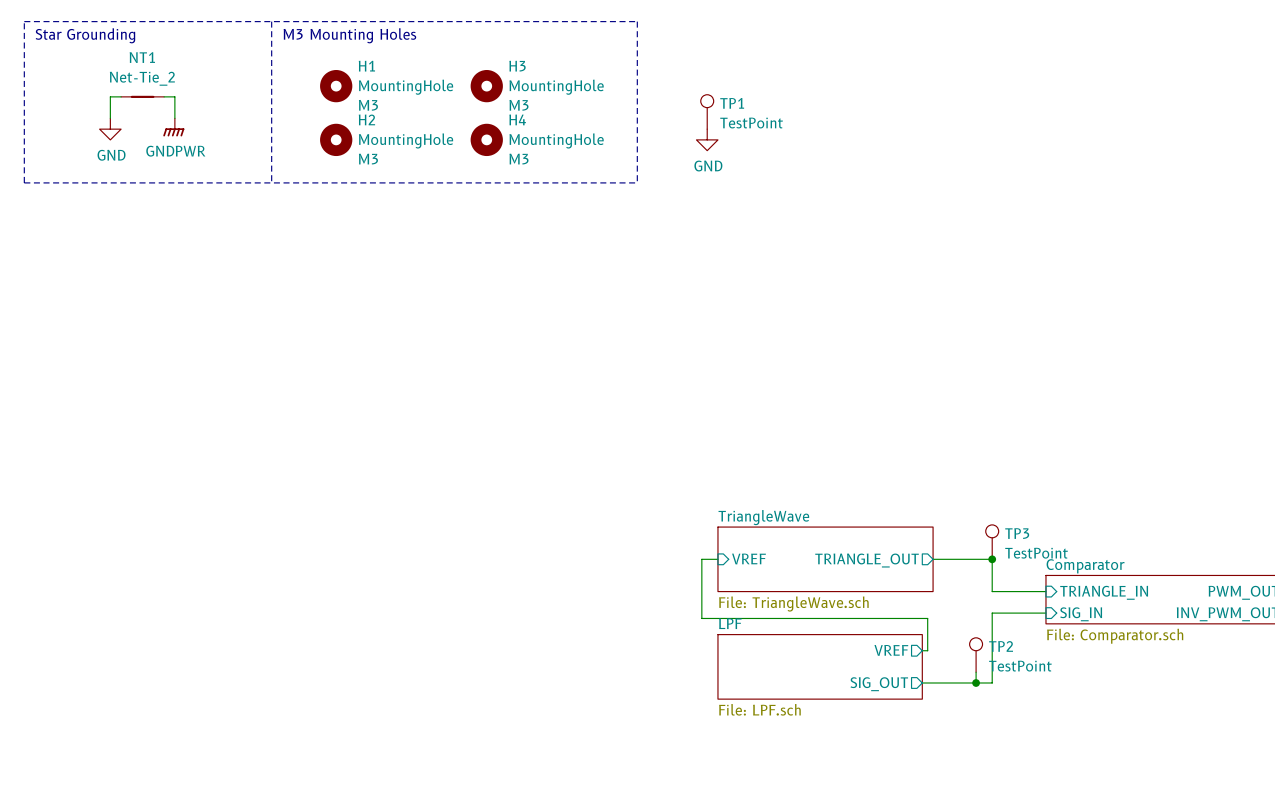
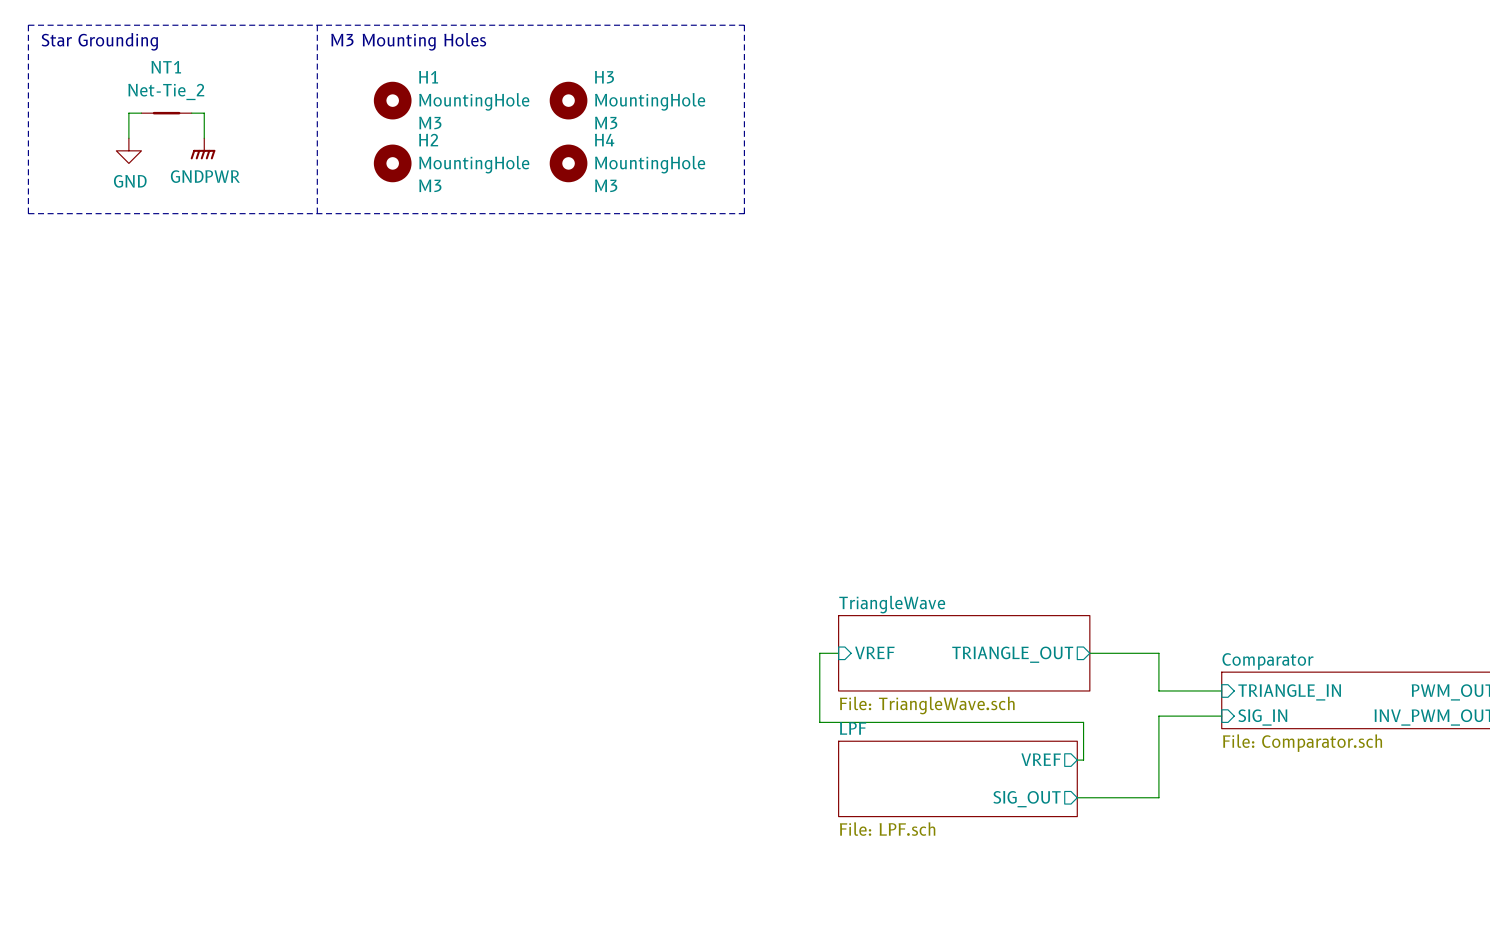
TP1: TestPoint (707, 111) -> none
power symbol: GND (707, 139) -> none
TP3: TestPoint (992, 542) -> none
junction: (992, 559) -> none
TP2: TestPoint (976, 655) -> none
wire: (976, 672) (976, 682) -> none
junction: (976, 682) -> none

